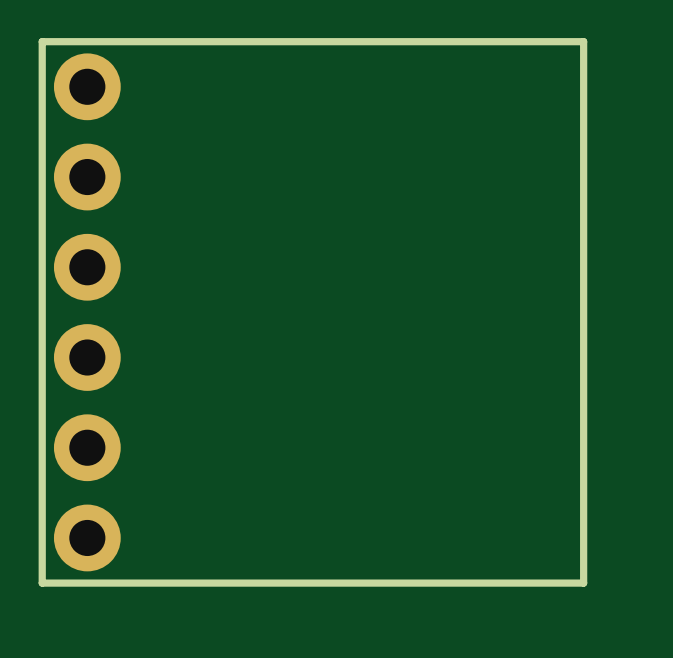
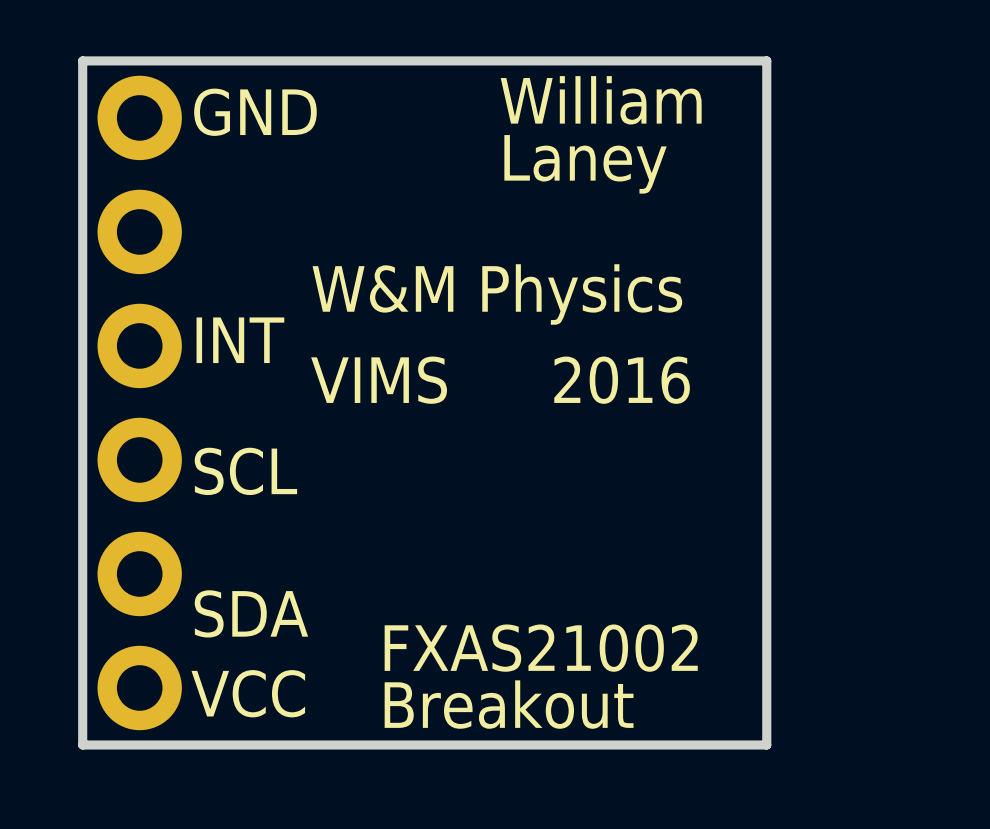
text: none -> William (601, 100)
text: none -> GND (255, 112)
text: none -> Laney (585, 164)
text: none -> W&M Physics (497, 294)
text: none -> INT (240, 340)
text: none -> VIMS (379, 380)
text: none -> 2016 (622, 380)
text: none -> SCL (245, 471)
text: none -> SDA (251, 613)
text: none -> FXAS21002 (541, 648)
text: none -> VCC (248, 693)
text: none -> Breakout (509, 704)

